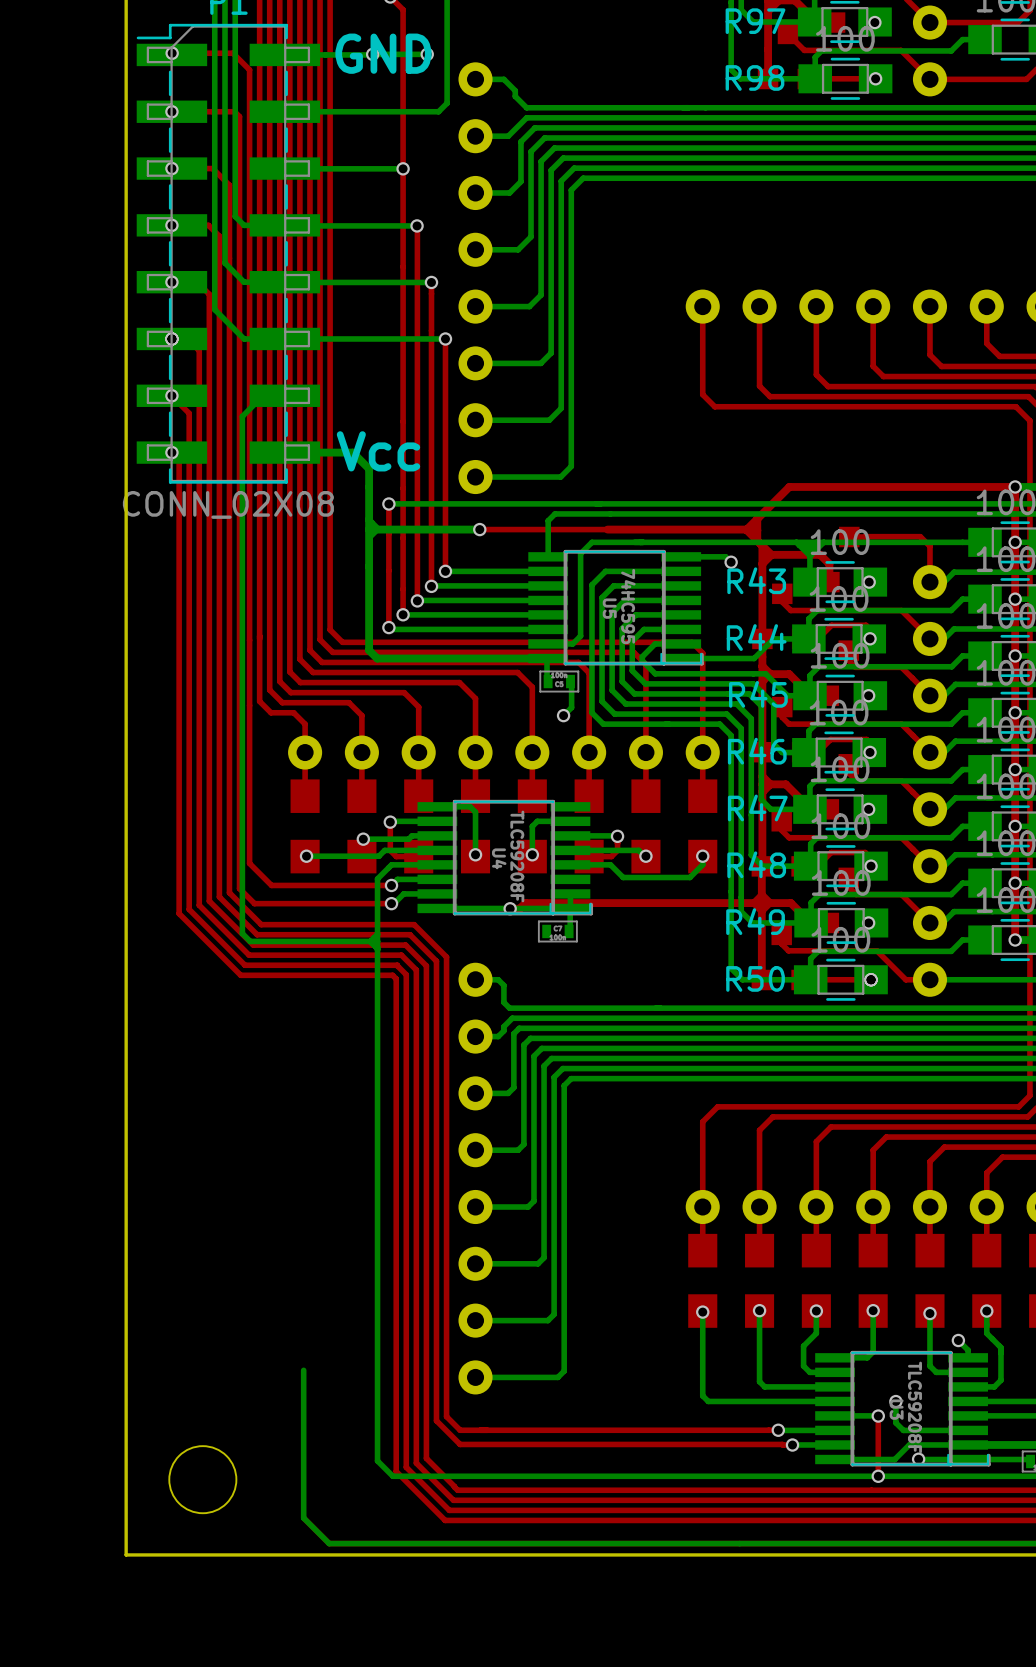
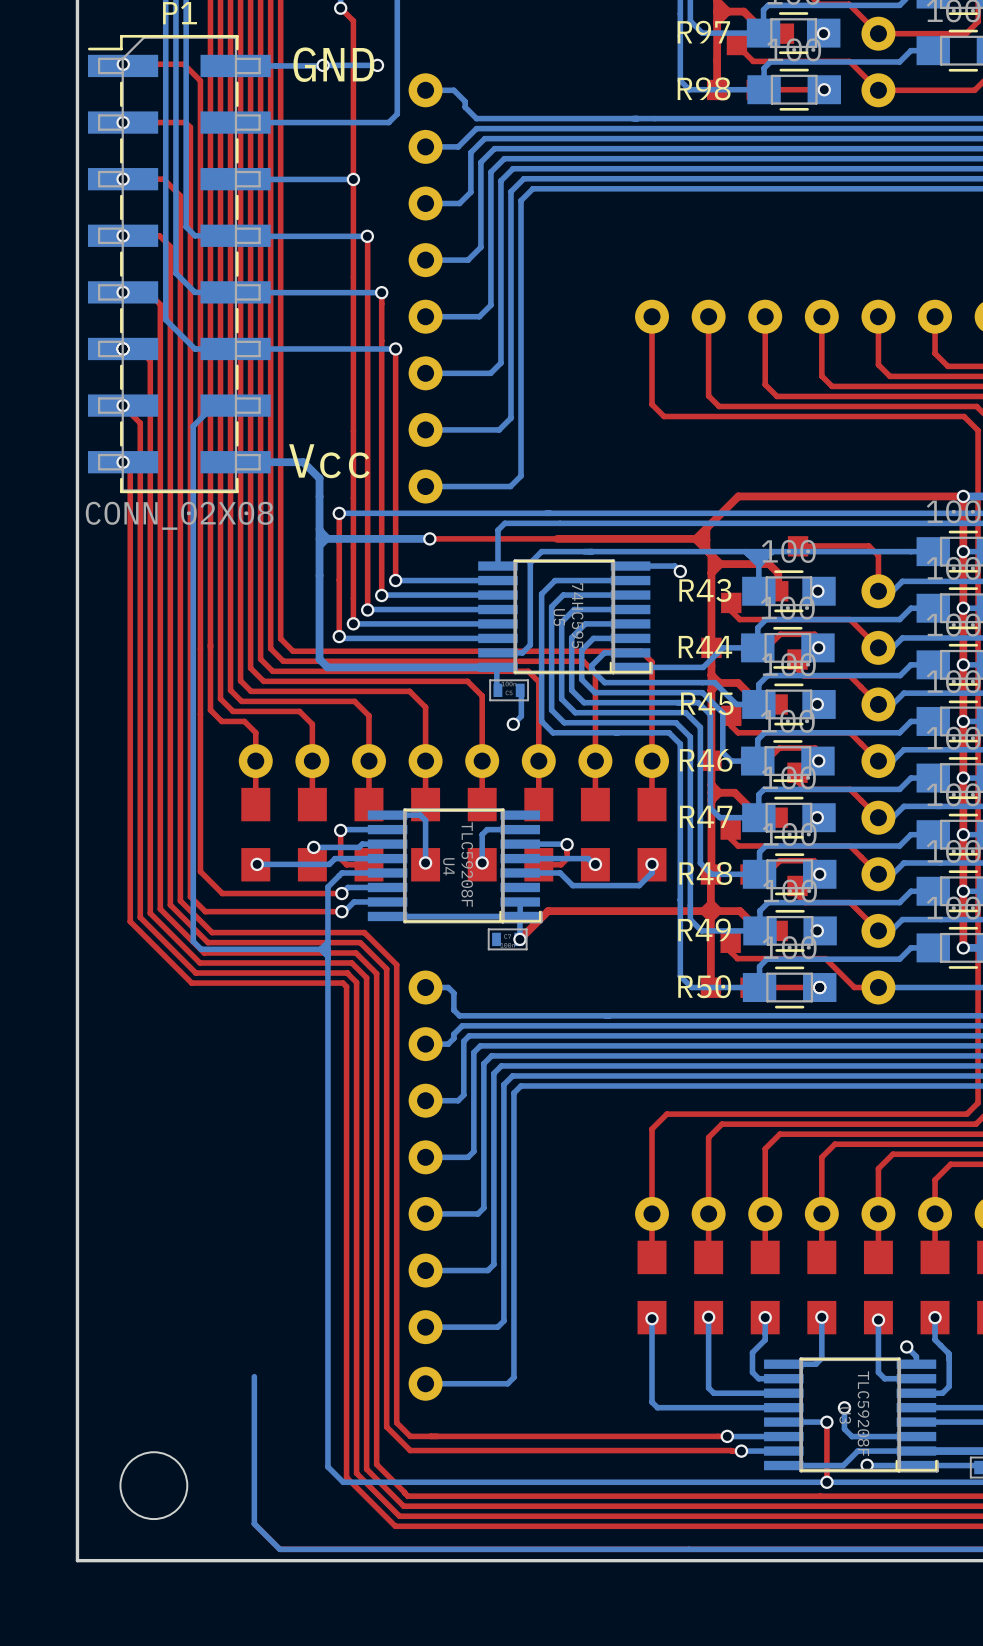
top track: (598, 903) (525, 903) (519, 908) (510, 908) -> (548, 911) (519, 939)
via position: (510, 908) -> (519, 939)

